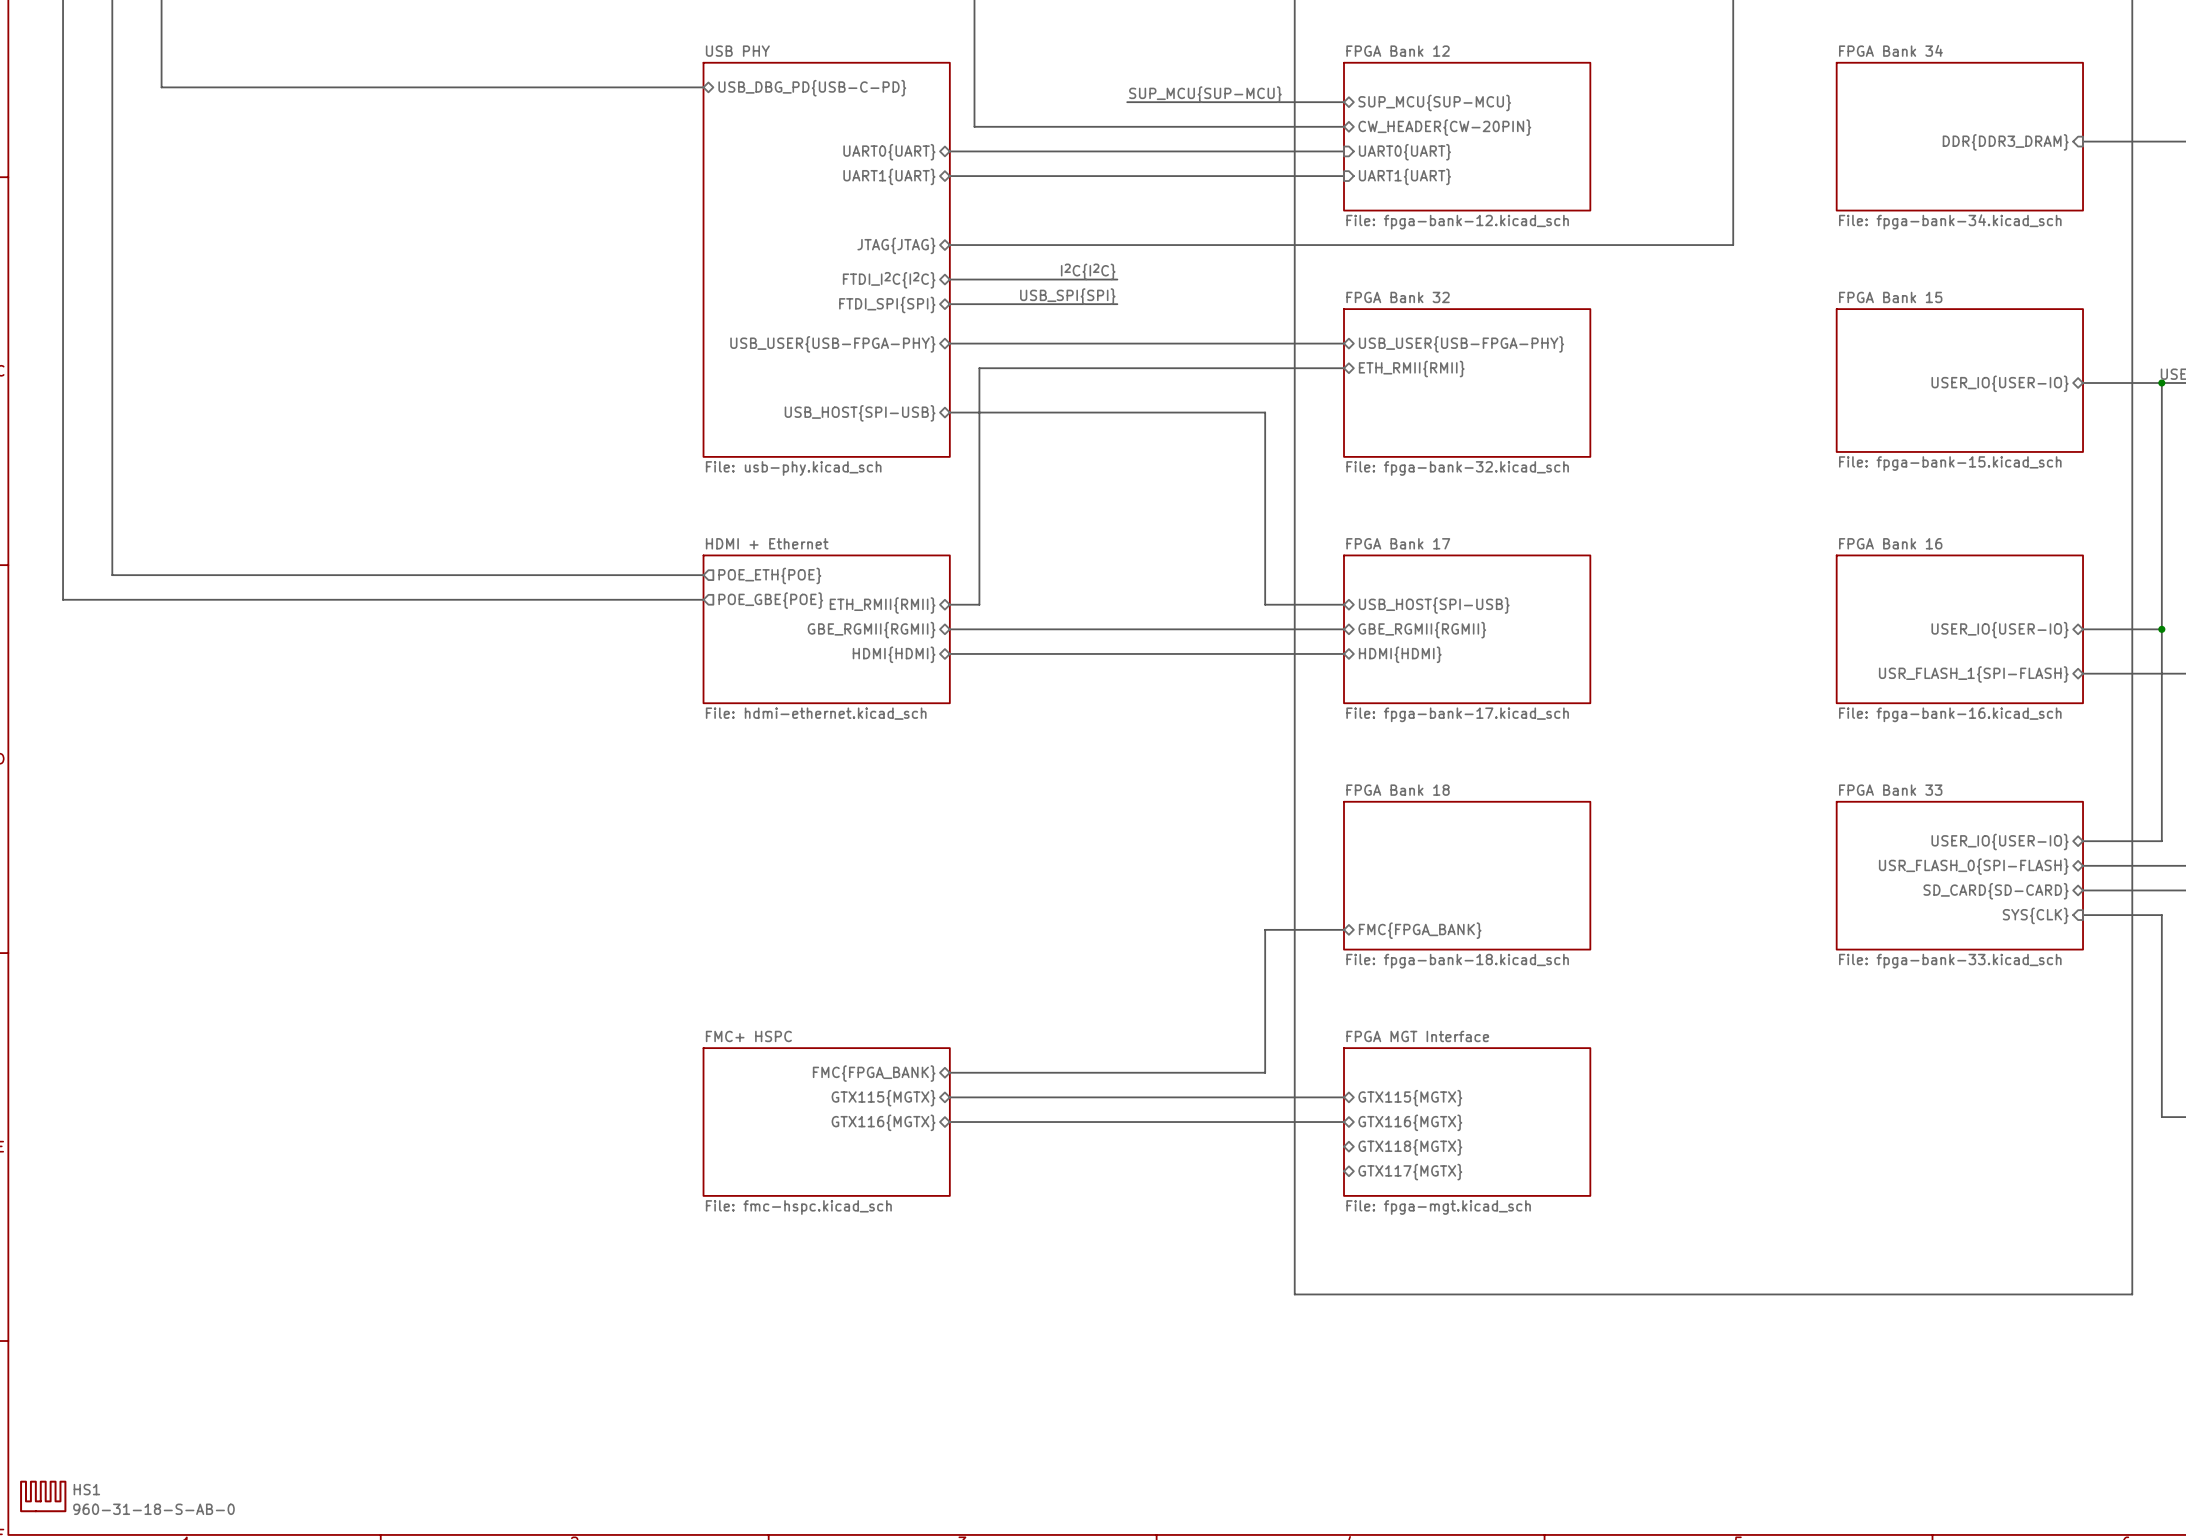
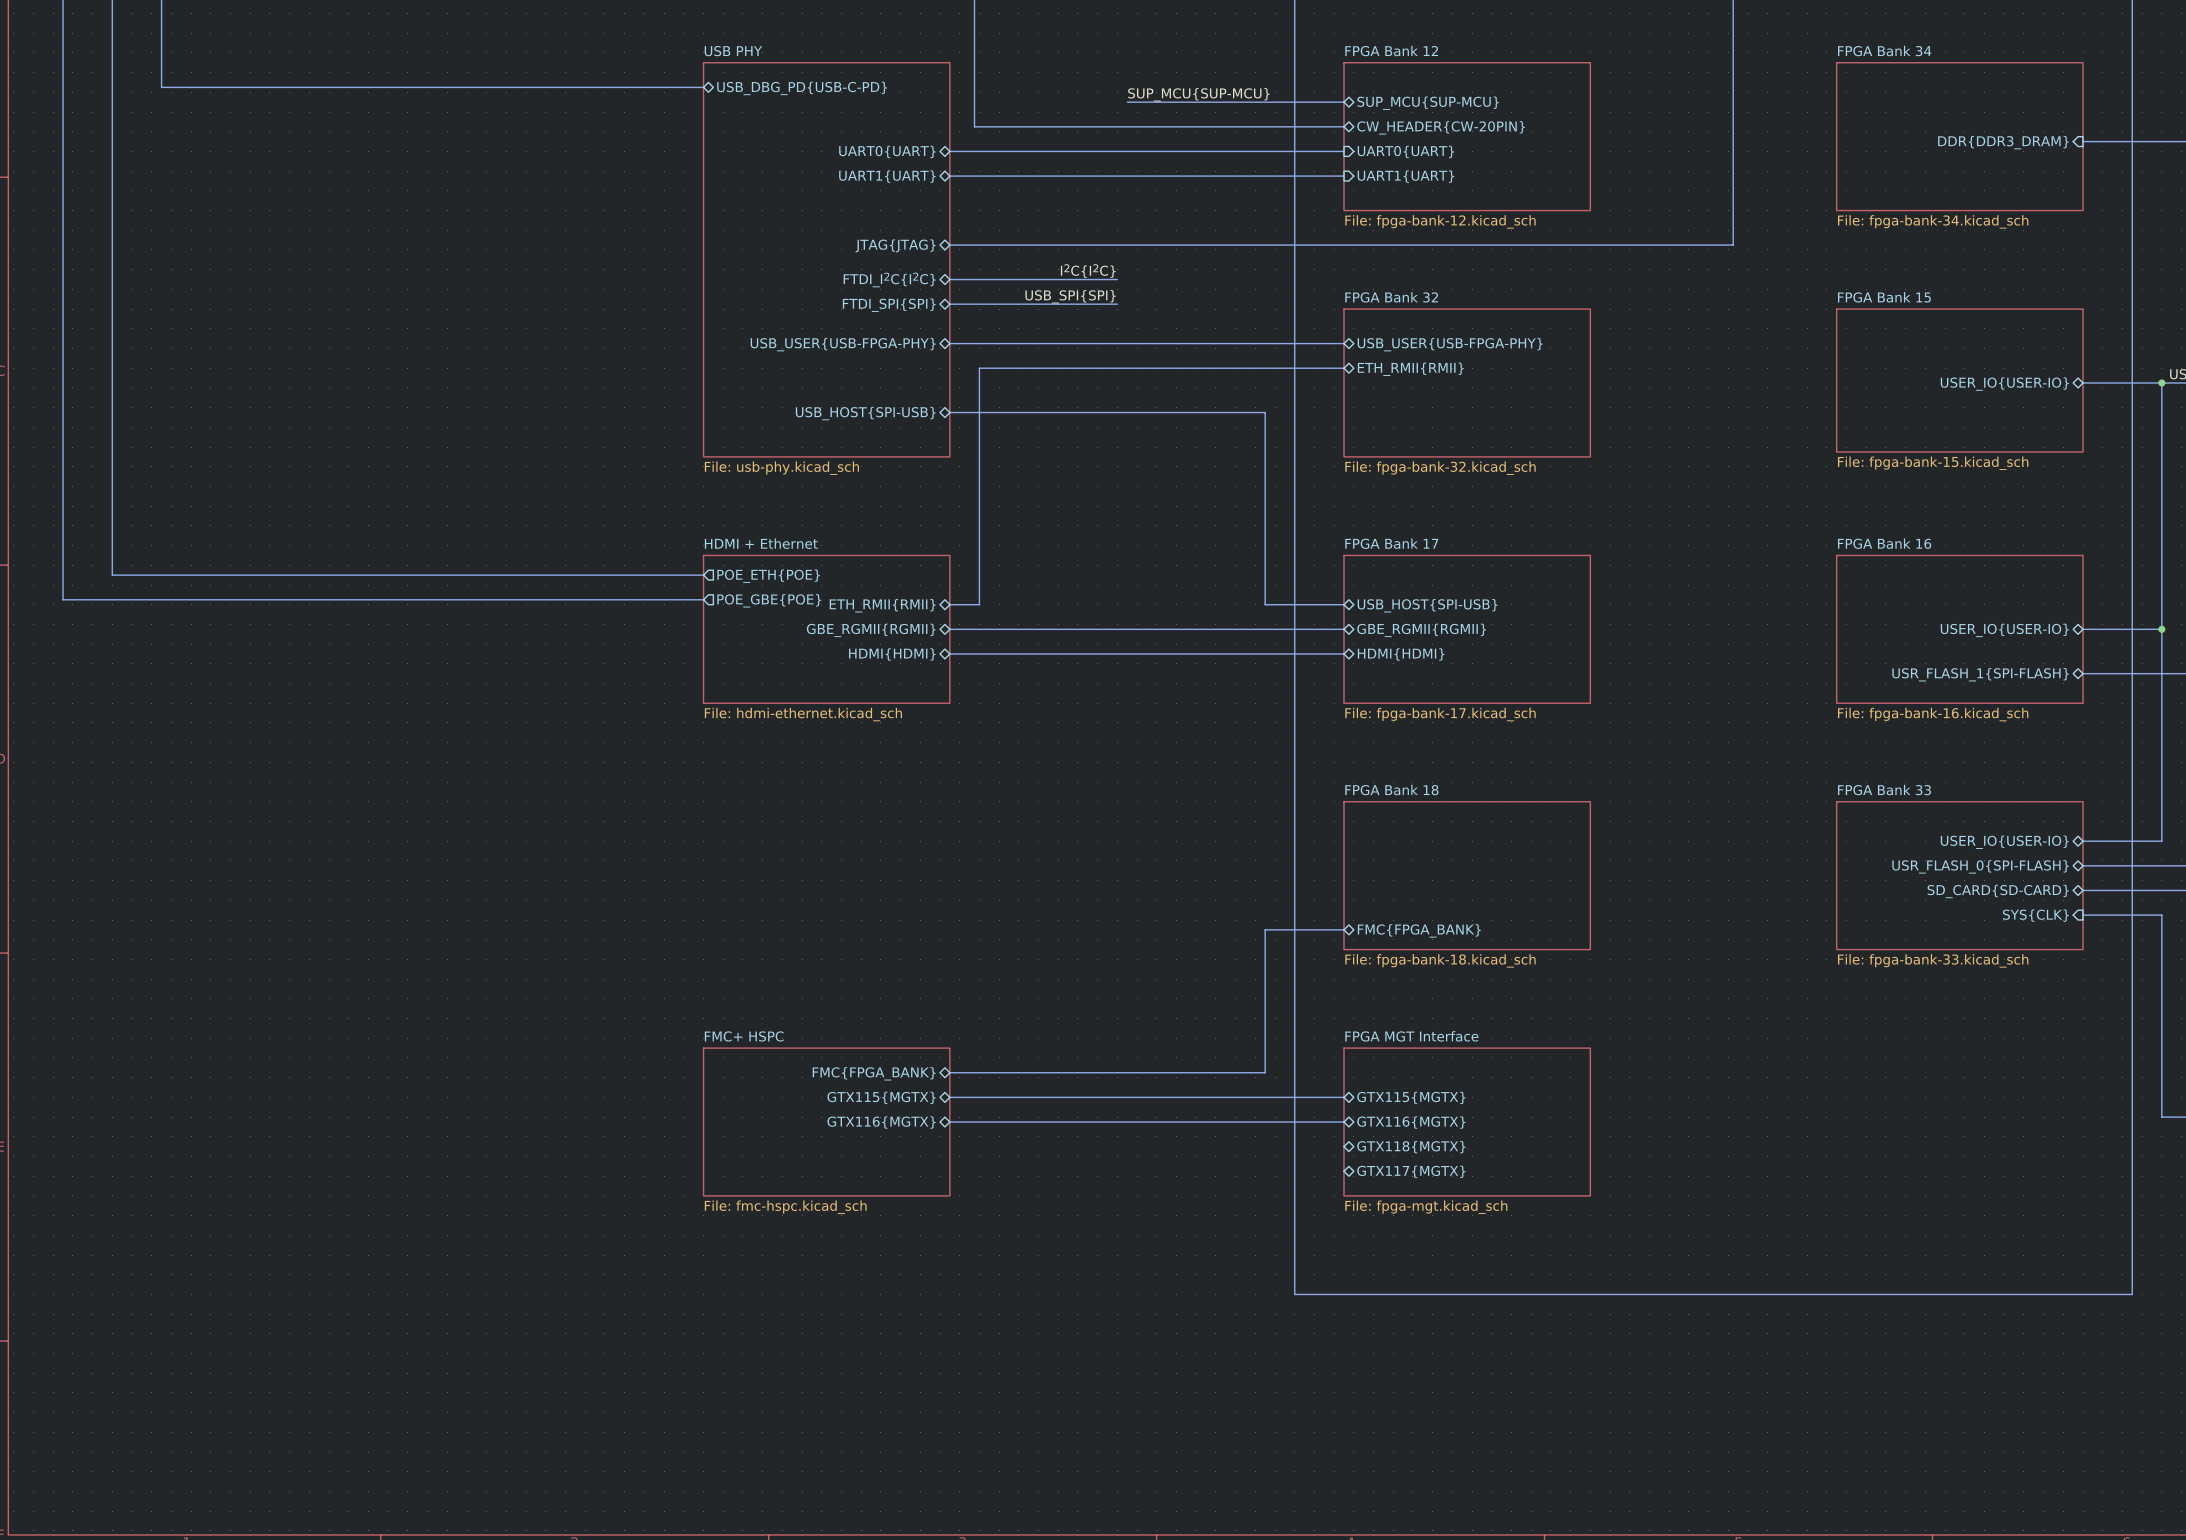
HS1: 960-31-18-S-AB-0 (43, 1496) -> none

